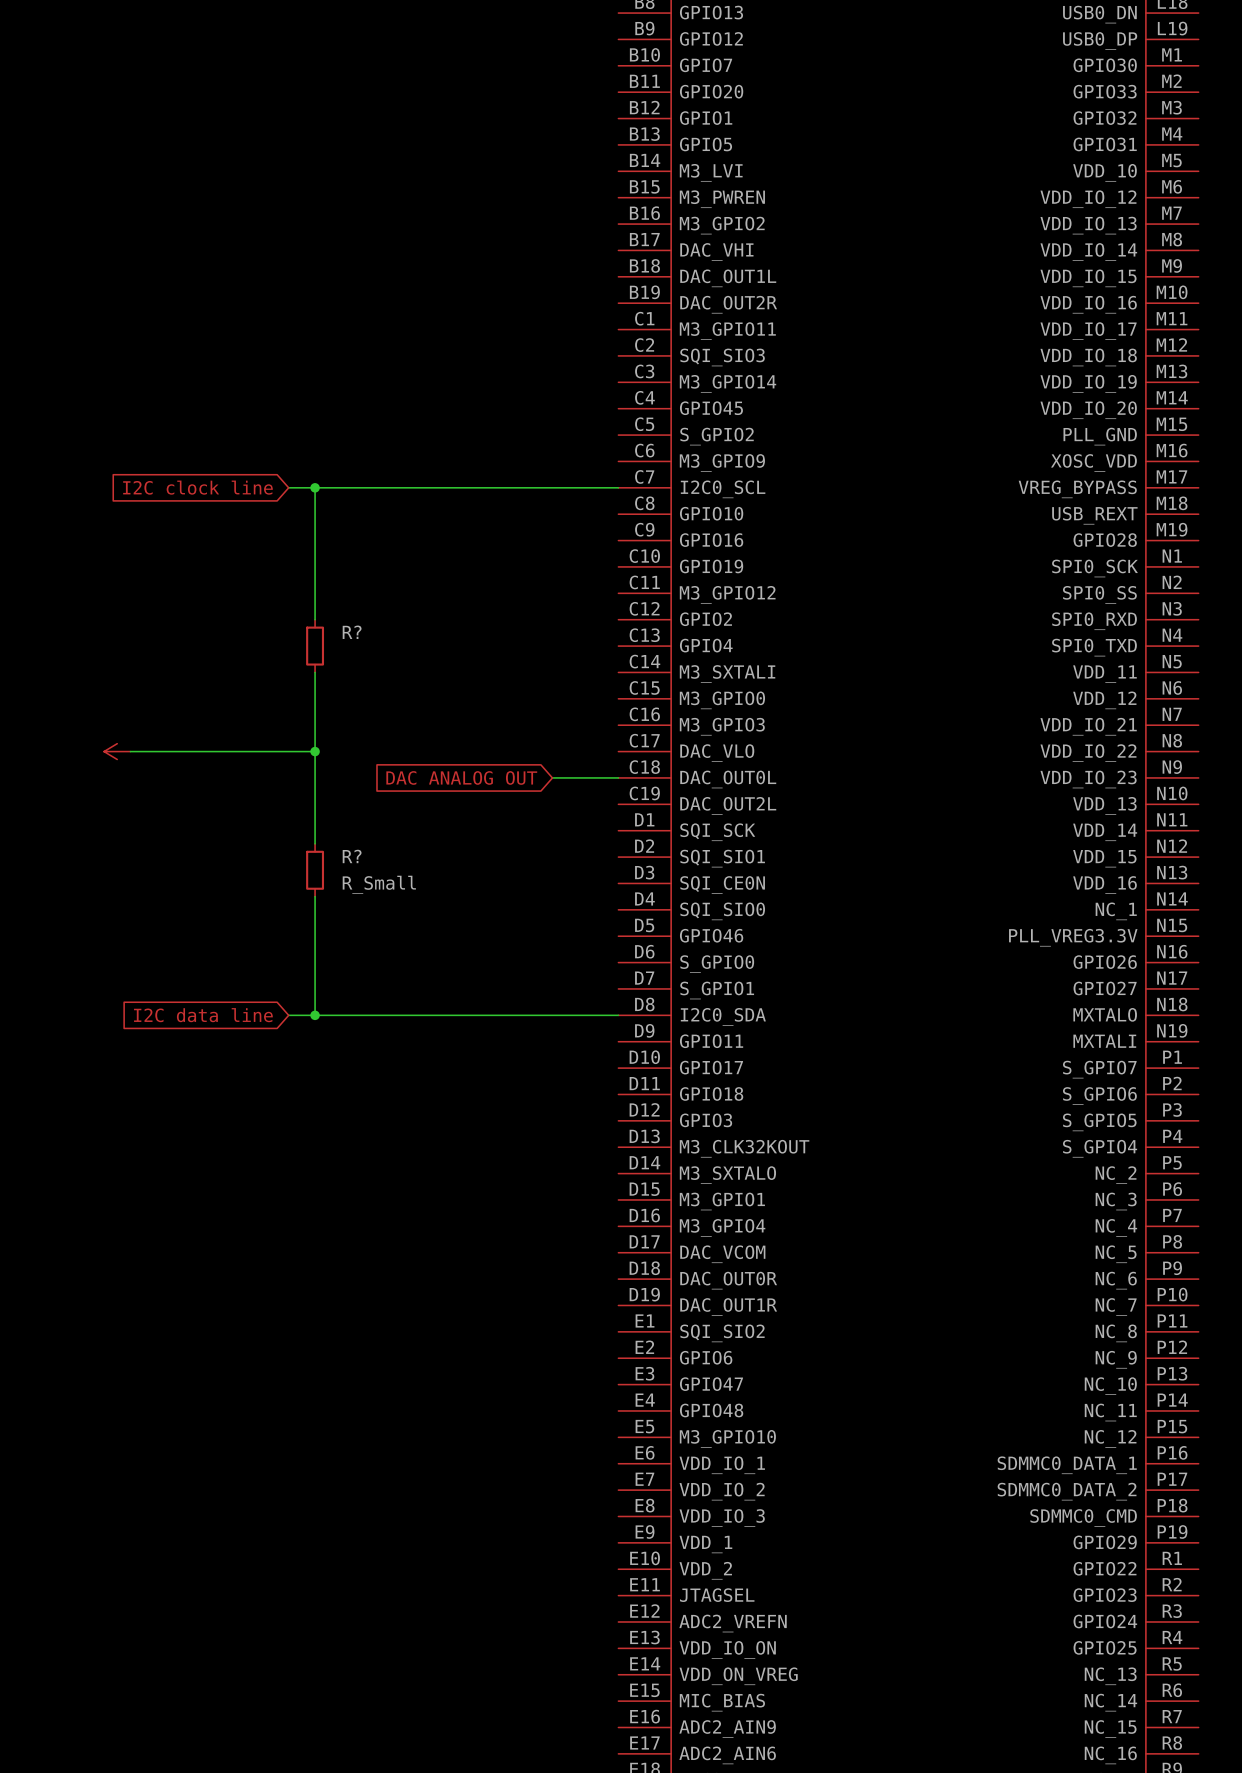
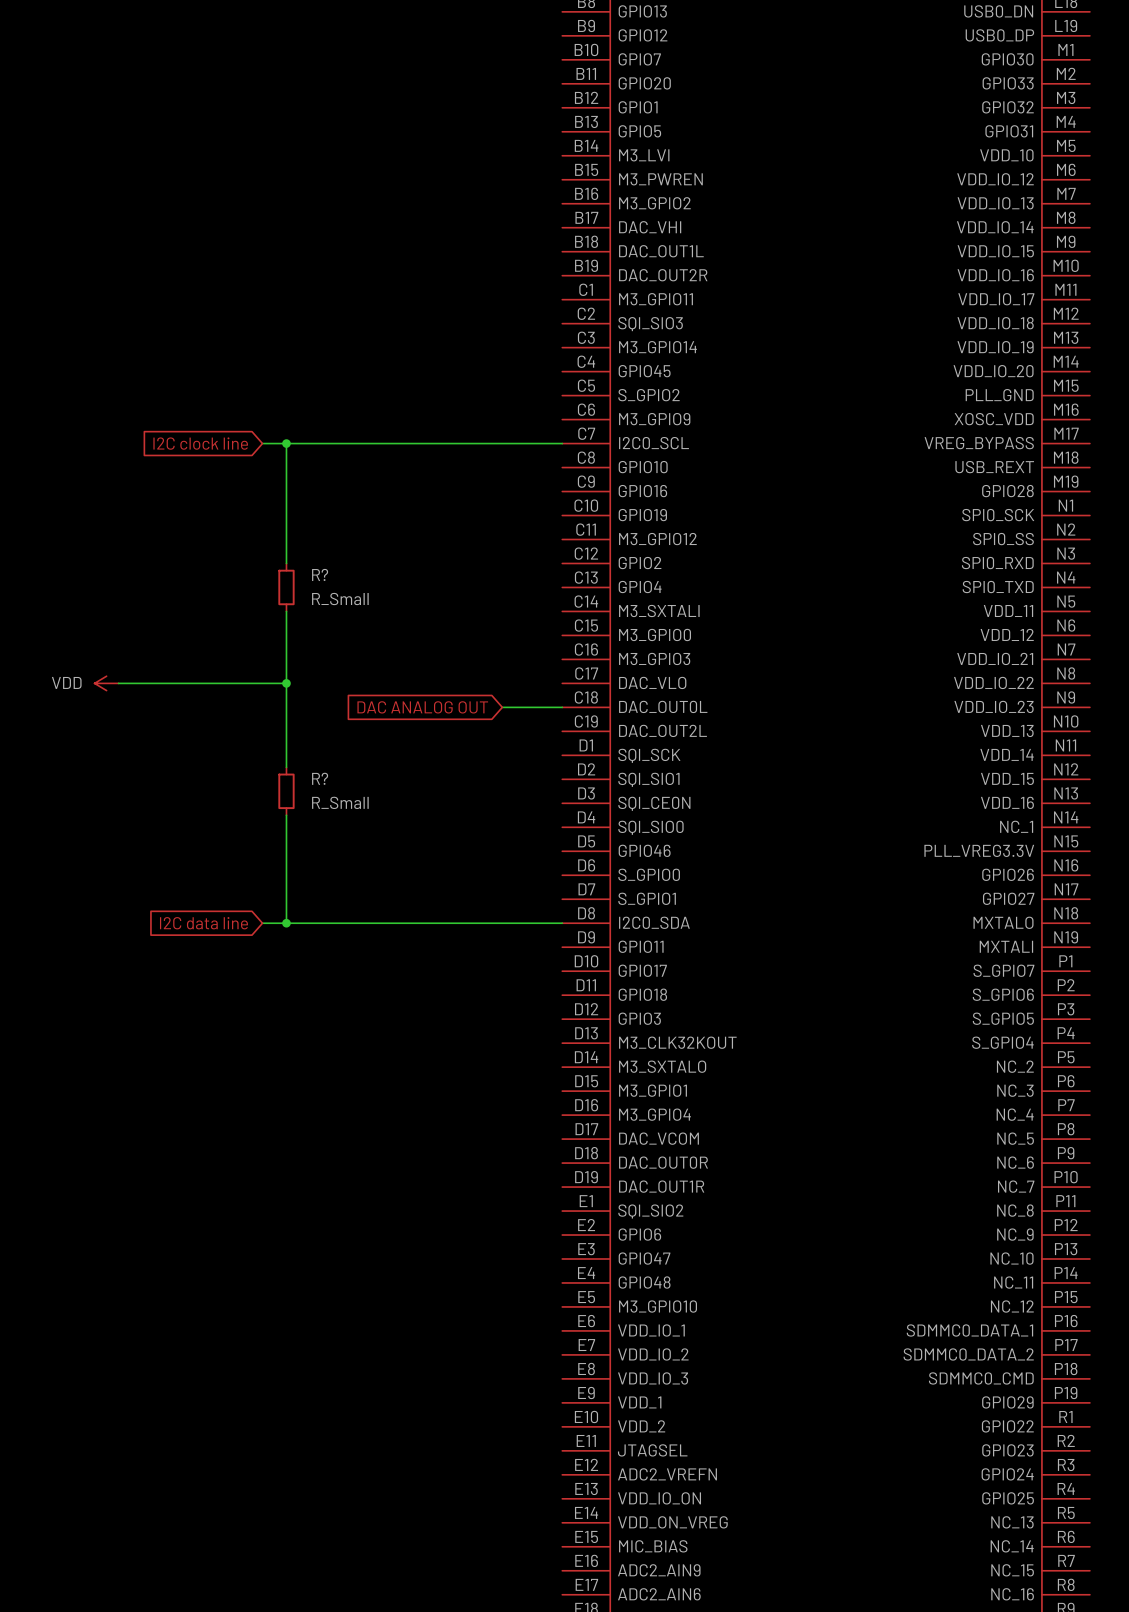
R? value: none -> R_Small (340, 599)
power symbol text: none -> VDD (66, 682)

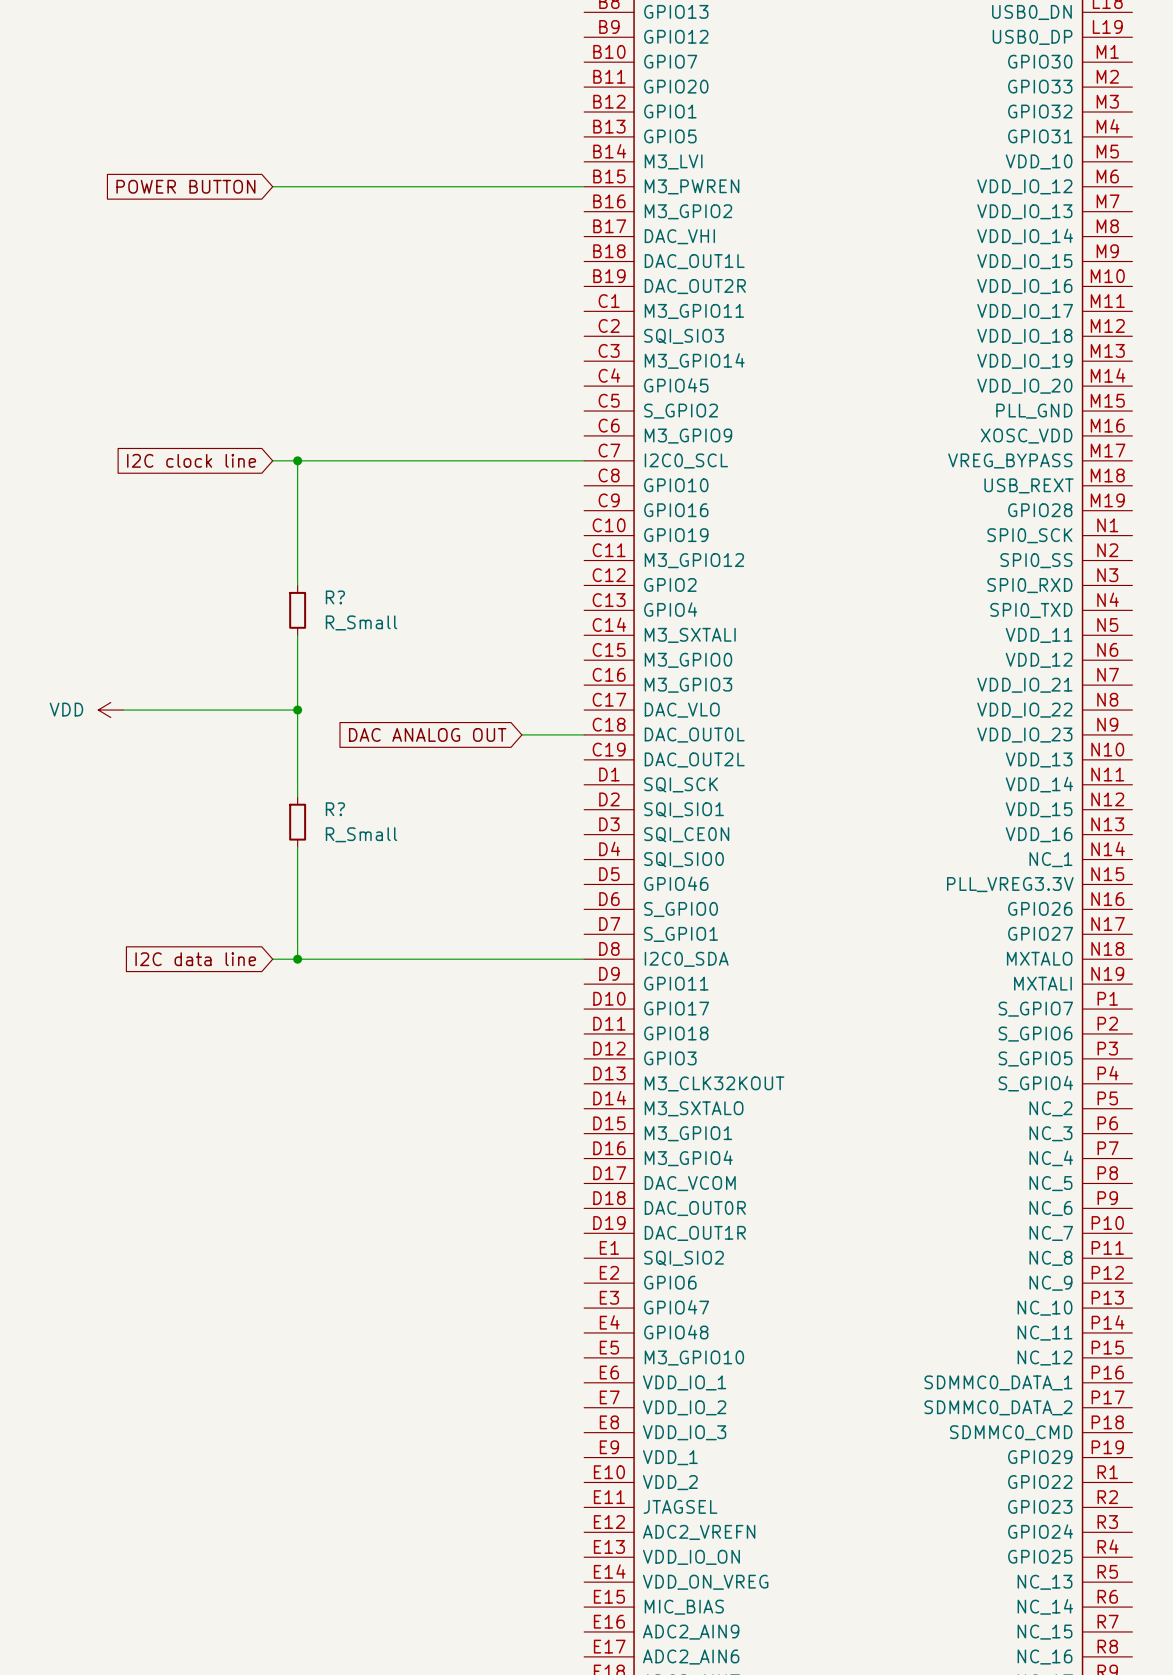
global label: none -> POWER BUTTON (185, 186)
wire: none -> (272, 186) (584, 186)

